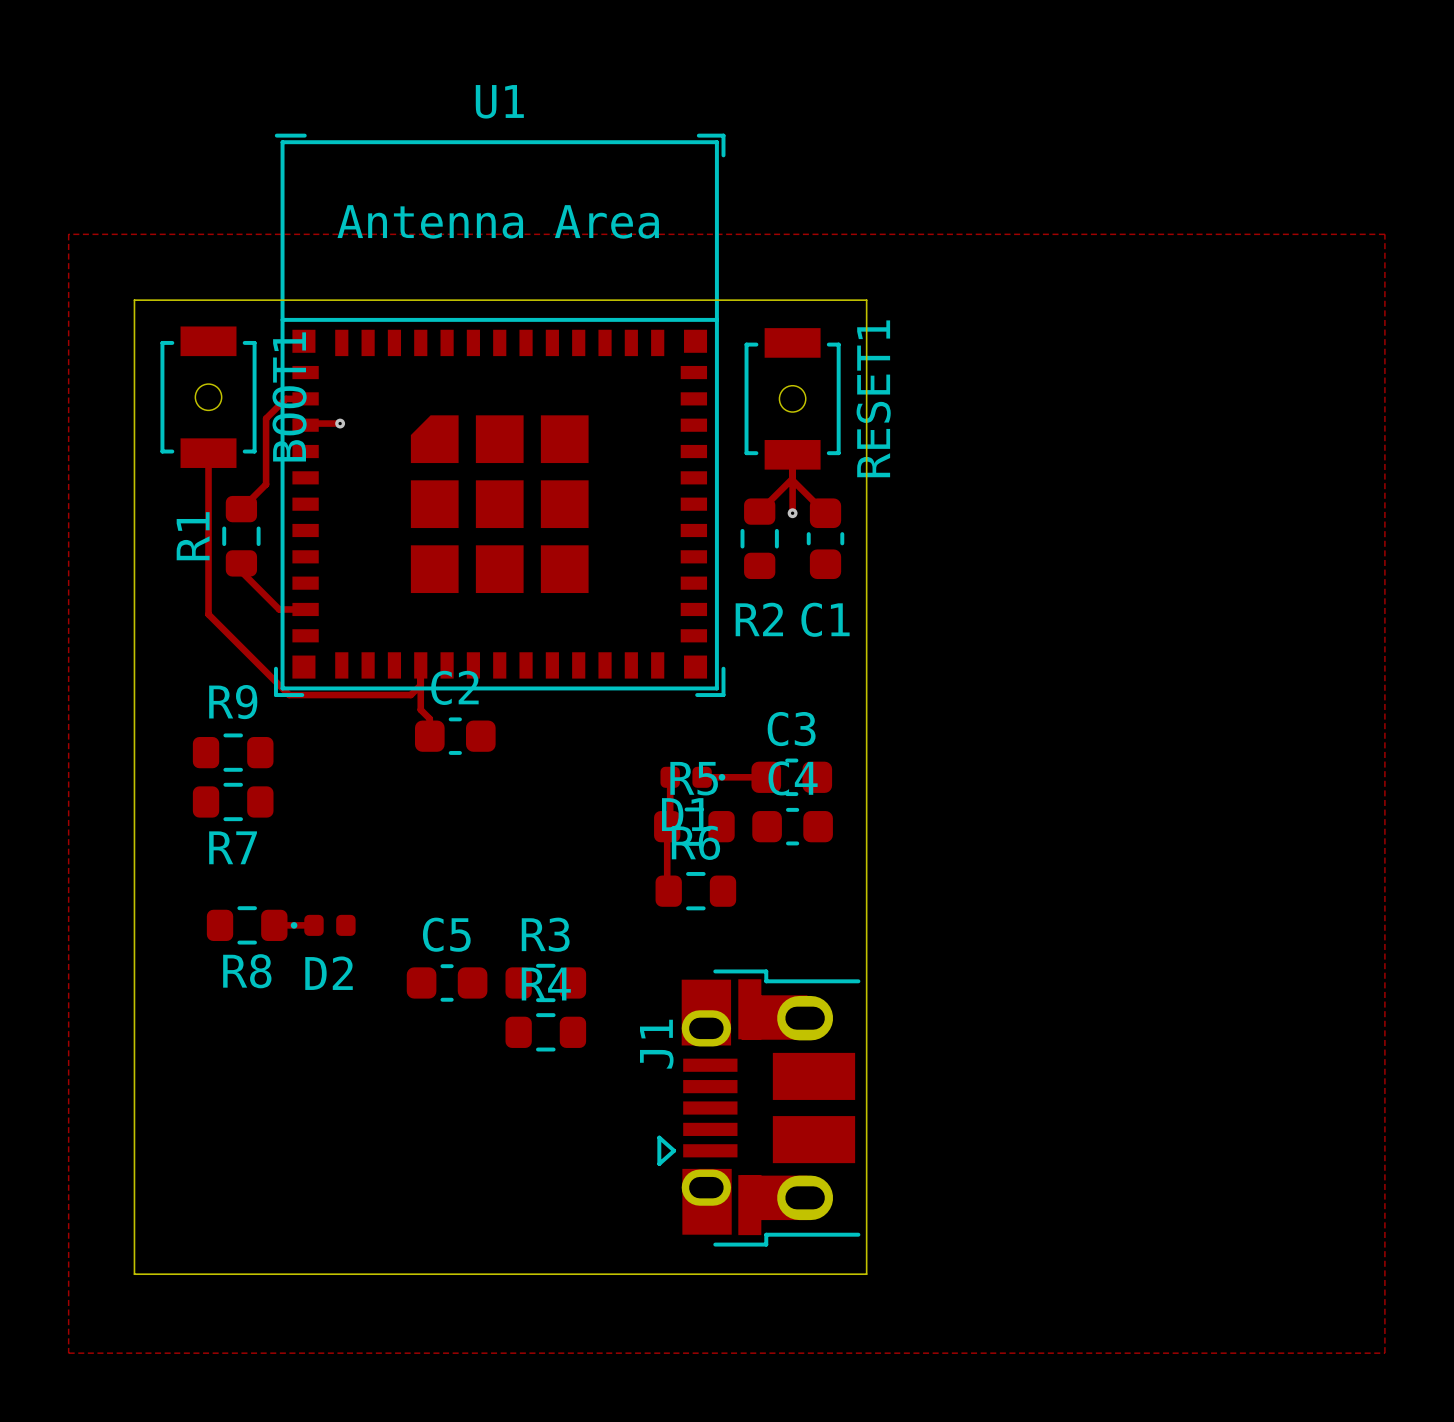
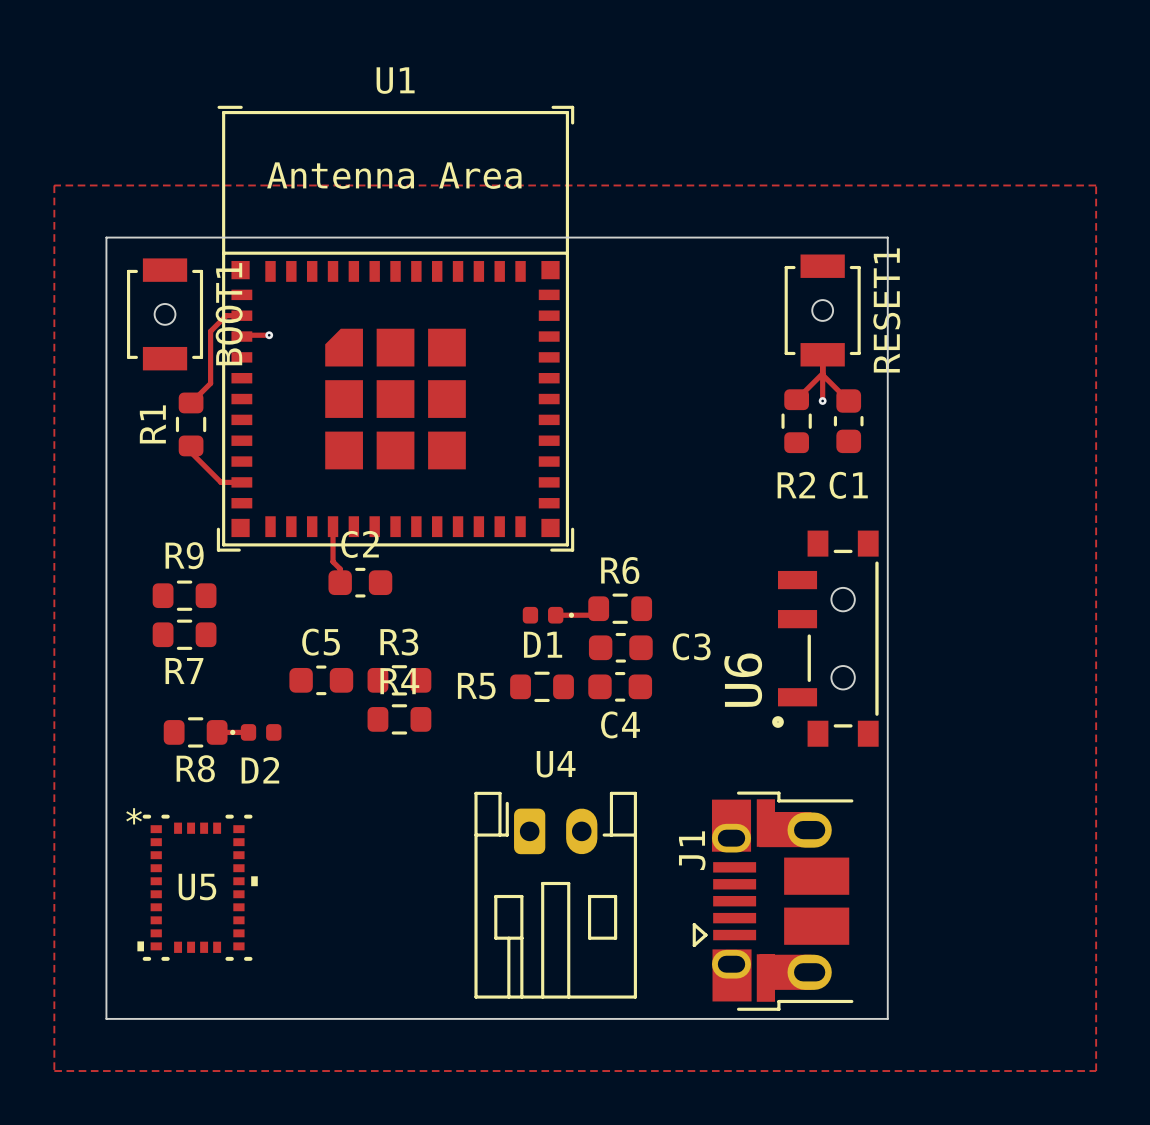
board edge: (866, 300) (866, 1274) (134, 1274) -> (685, 237) (887, 237) (887, 1018) (106, 1018) (106, 1008)
RESET1 position: (792, 398) -> (822, 310)
track: (208, 453) (208, 614) (289, 695) (410, 695) (420, 685) -> none
track: (792, 454) (792, 513) -> (822, 354) (822, 401)
track: (792, 478) (759, 511) -> (822, 373) (796, 399)
track: (792, 480) (825, 513) -> (822, 374) (848, 401)
via: none -> (822, 401)
via: (792, 513) -> none
R2 position: (759, 538) -> (796, 421)
C1 position: (825, 538) -> (848, 421)
C3 name position: C3 (791, 729) -> C3 (691, 646)
track: (670, 777) (670, 823) (667, 826) (668, 891) -> none
C3 position: (791, 777) -> (620, 647)
R5 name position: R5 (694, 778) -> R5 (476, 686)
C4 name position: C4 (793, 778) -> C4 (620, 724)
U6: none -> (825, 638)
R5 position: (694, 826) -> (542, 686)
C4 position: (792, 826) -> (620, 686)
R6 position: (695, 891) -> (620, 608)
C5 position: (447, 982) -> (321, 680)
R3 position: (545, 982) -> (399, 680)
R4 position: (545, 1032) -> (399, 719)
J1 position: (758, 1108) -> (773, 901)
U5: none -> (197, 887)
U4: none -> (555, 895)

